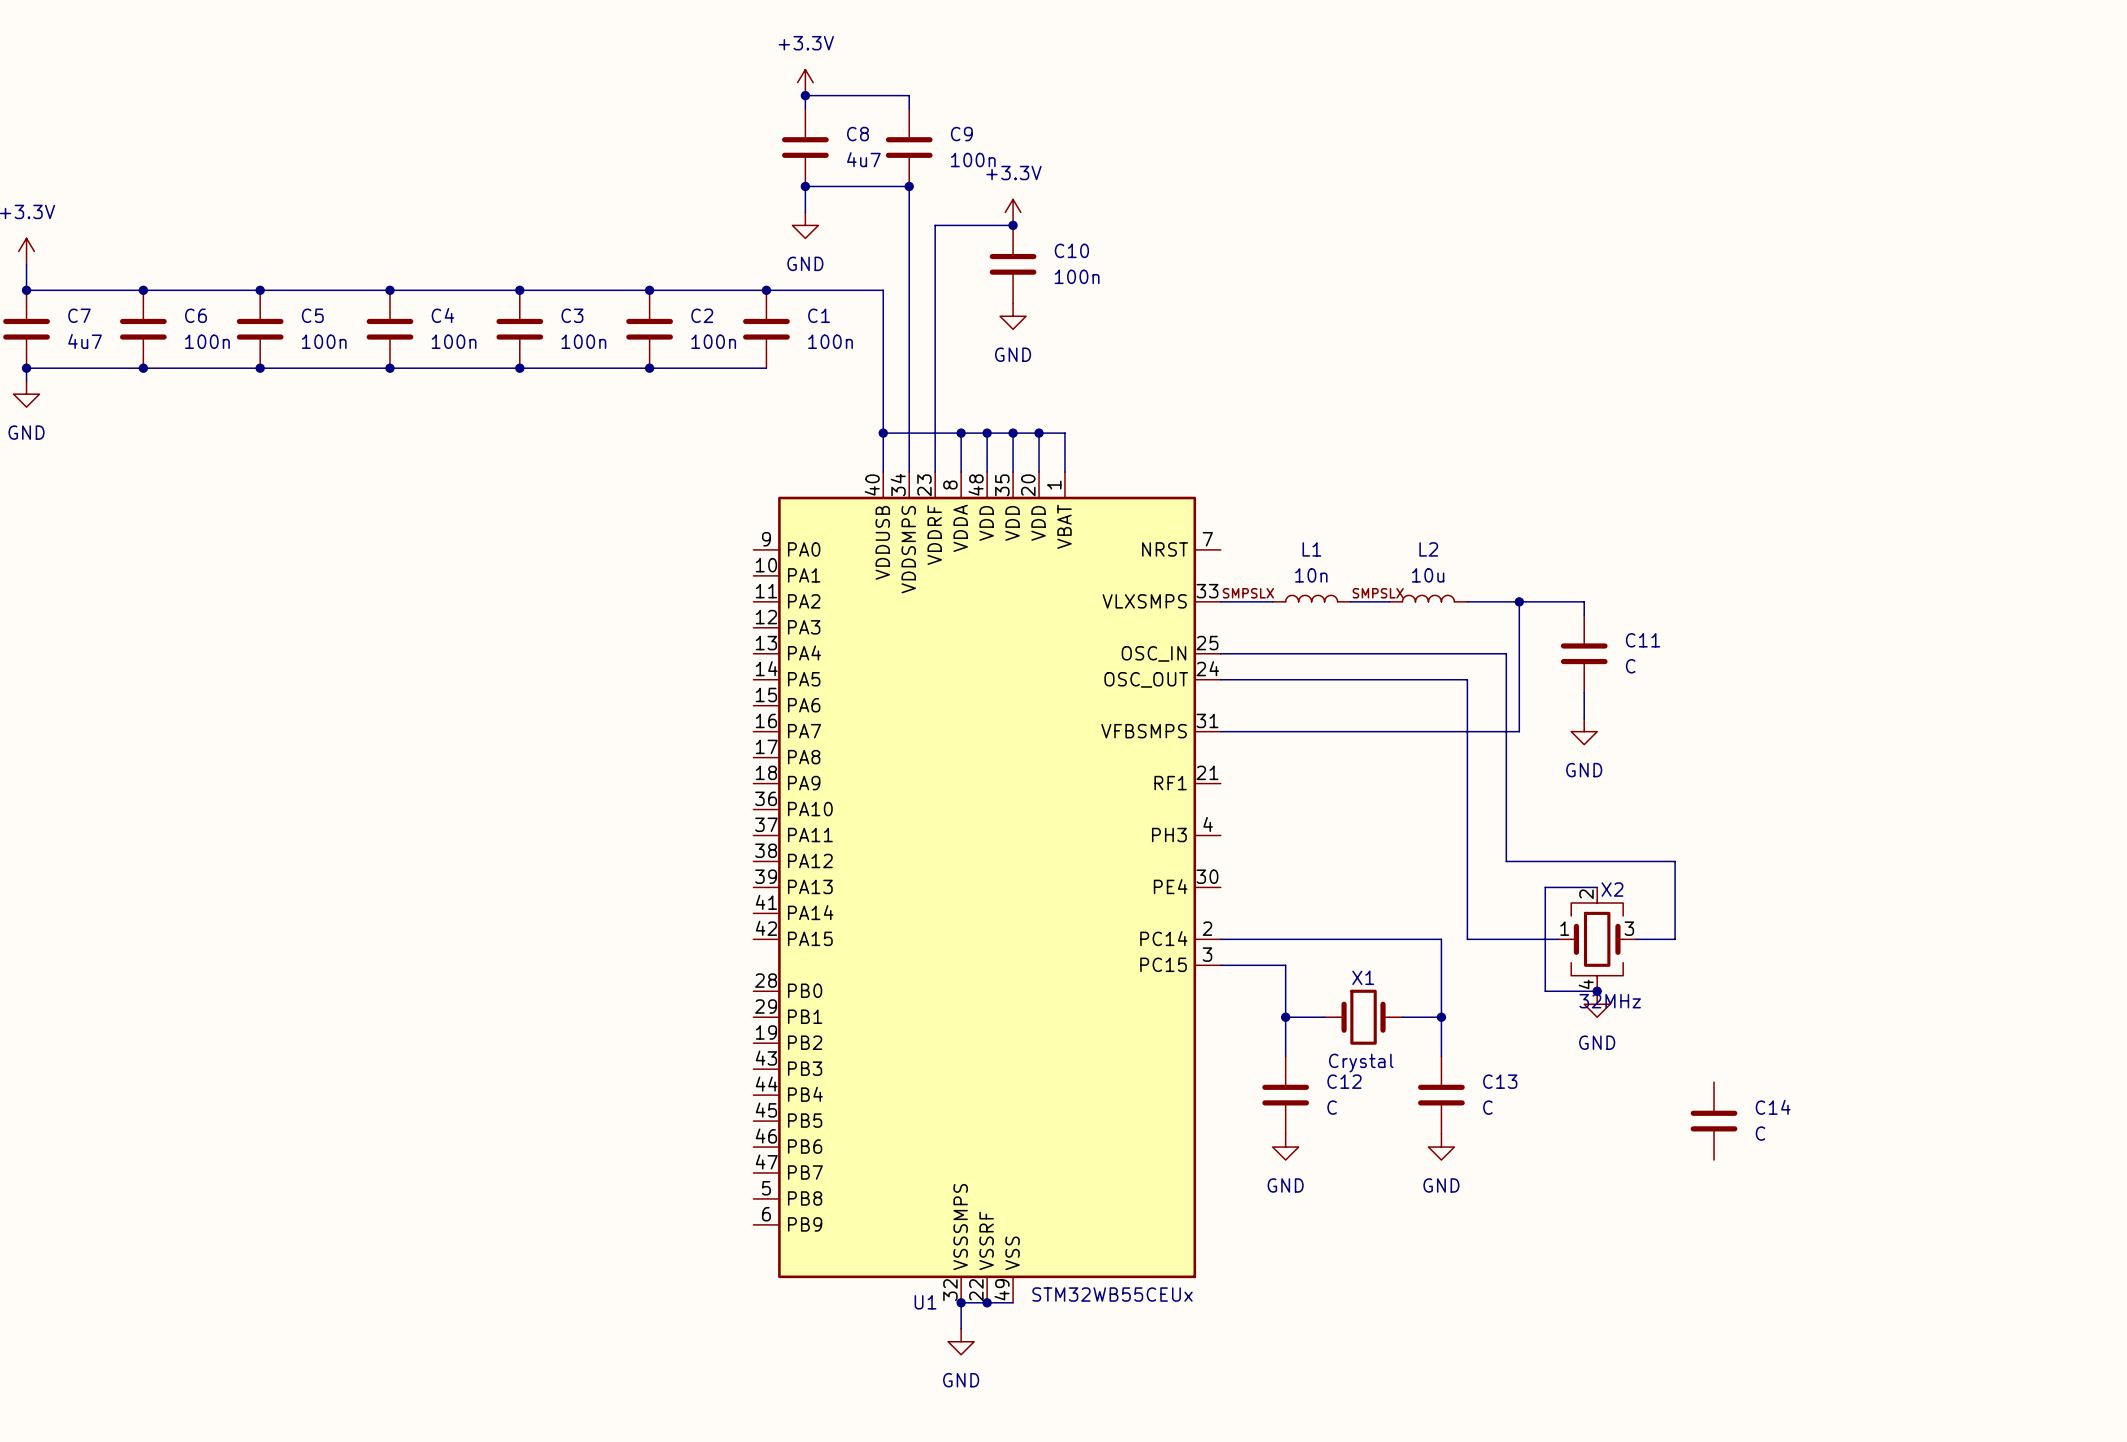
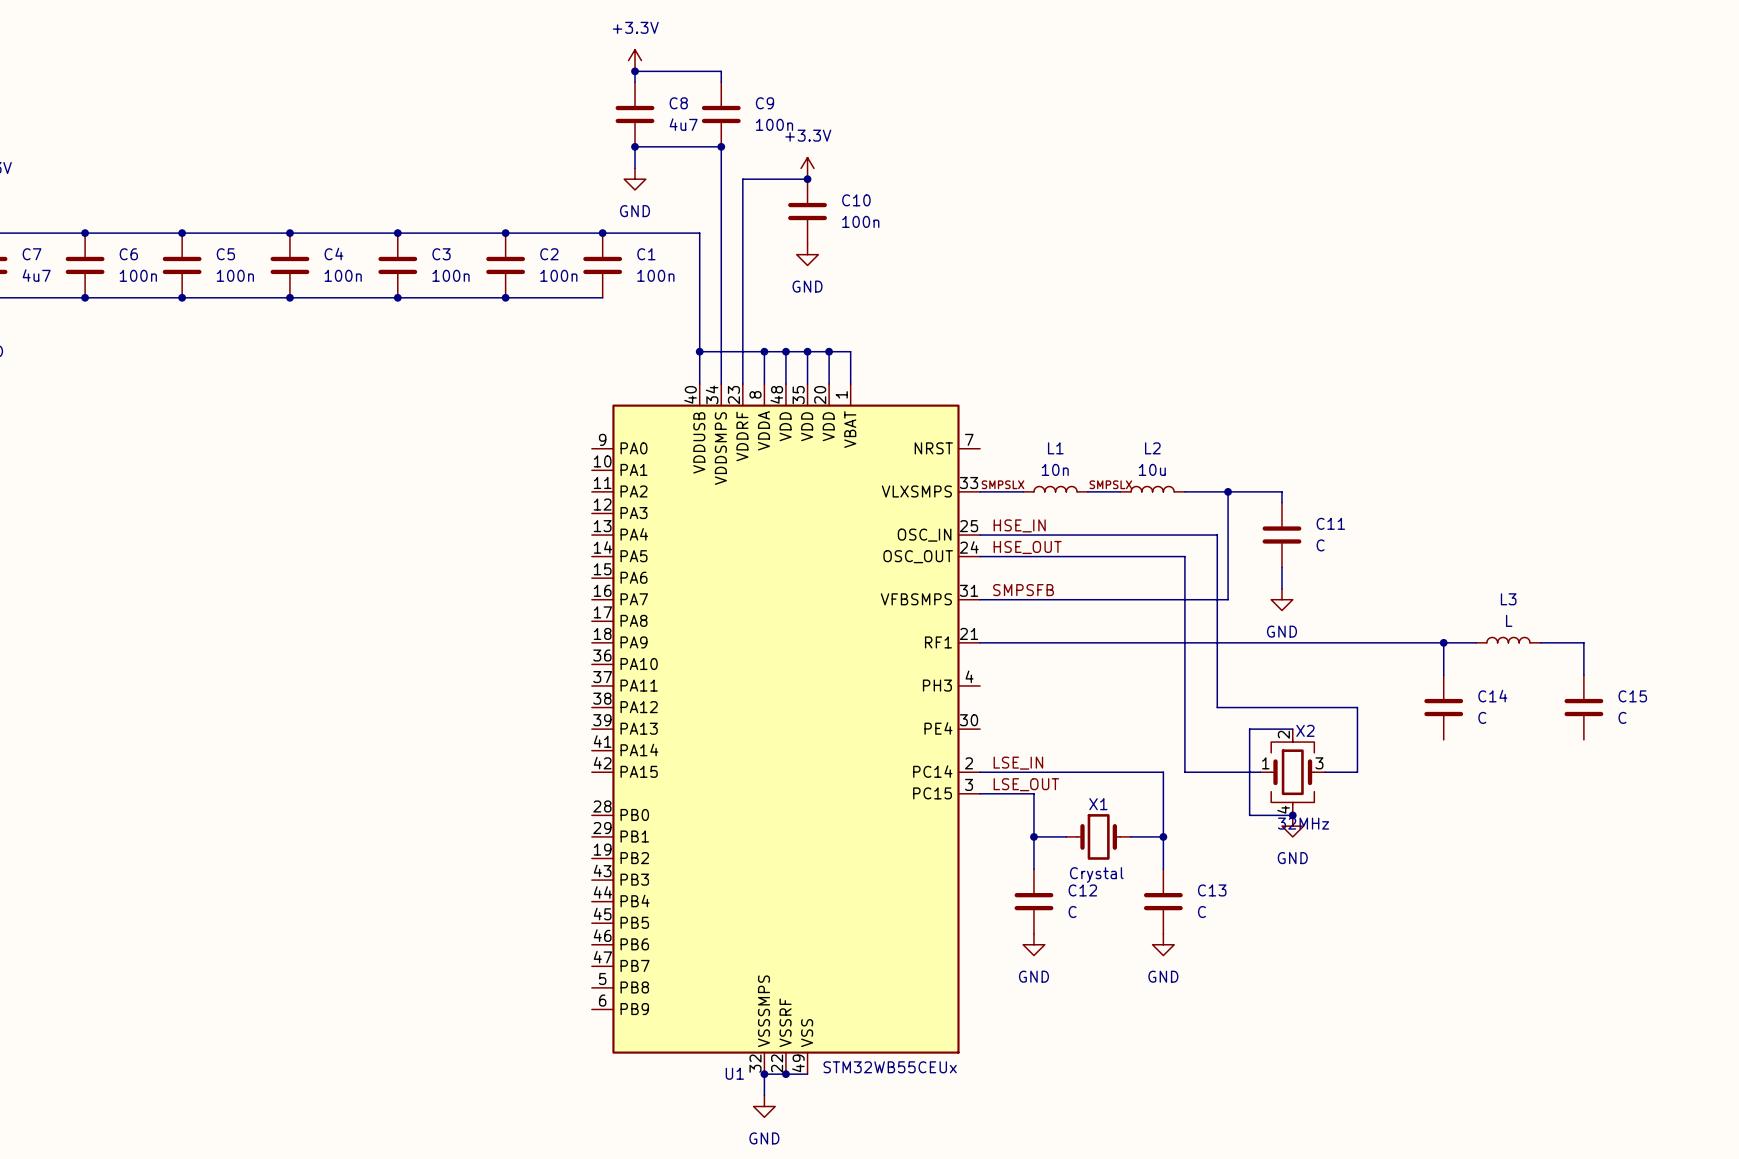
label: none -> HSE_IN (1019, 525)
label: none -> HSE_OUT (1027, 547)
label: none -> SMPSFB (1023, 590)
L3: none -> L (1508, 640)
wire: none -> (980, 642) (1476, 642)
wire: none -> (1443, 642) (1443, 675)
junction: none -> (1443, 642)
wire: none -> (1540, 642) (1583, 642) (1583, 675)
C15: none -> C (1583, 707)
label: none -> LSE_IN (1018, 763)
label: none -> LSE_OUT (1026, 784)
C14 position: (1714, 1121) -> (1443, 707)

